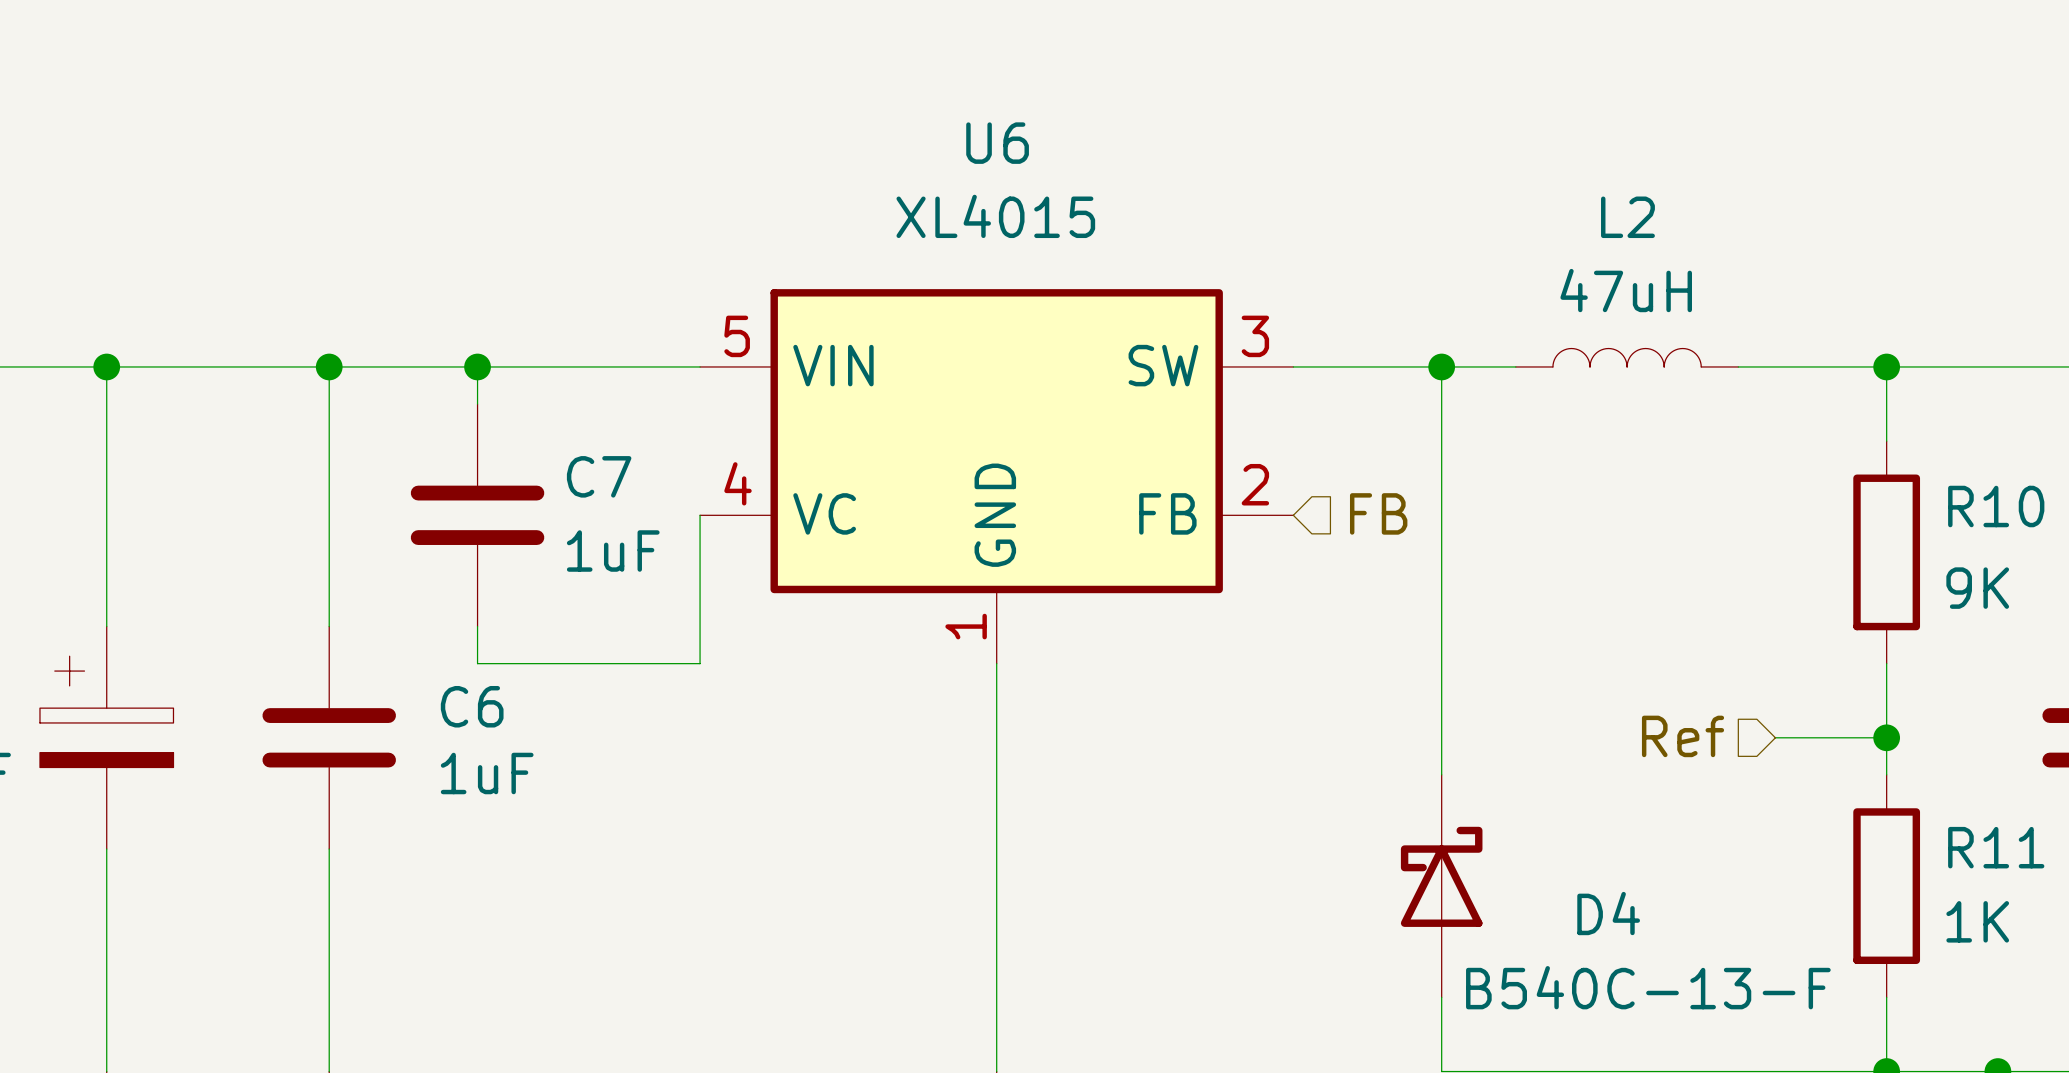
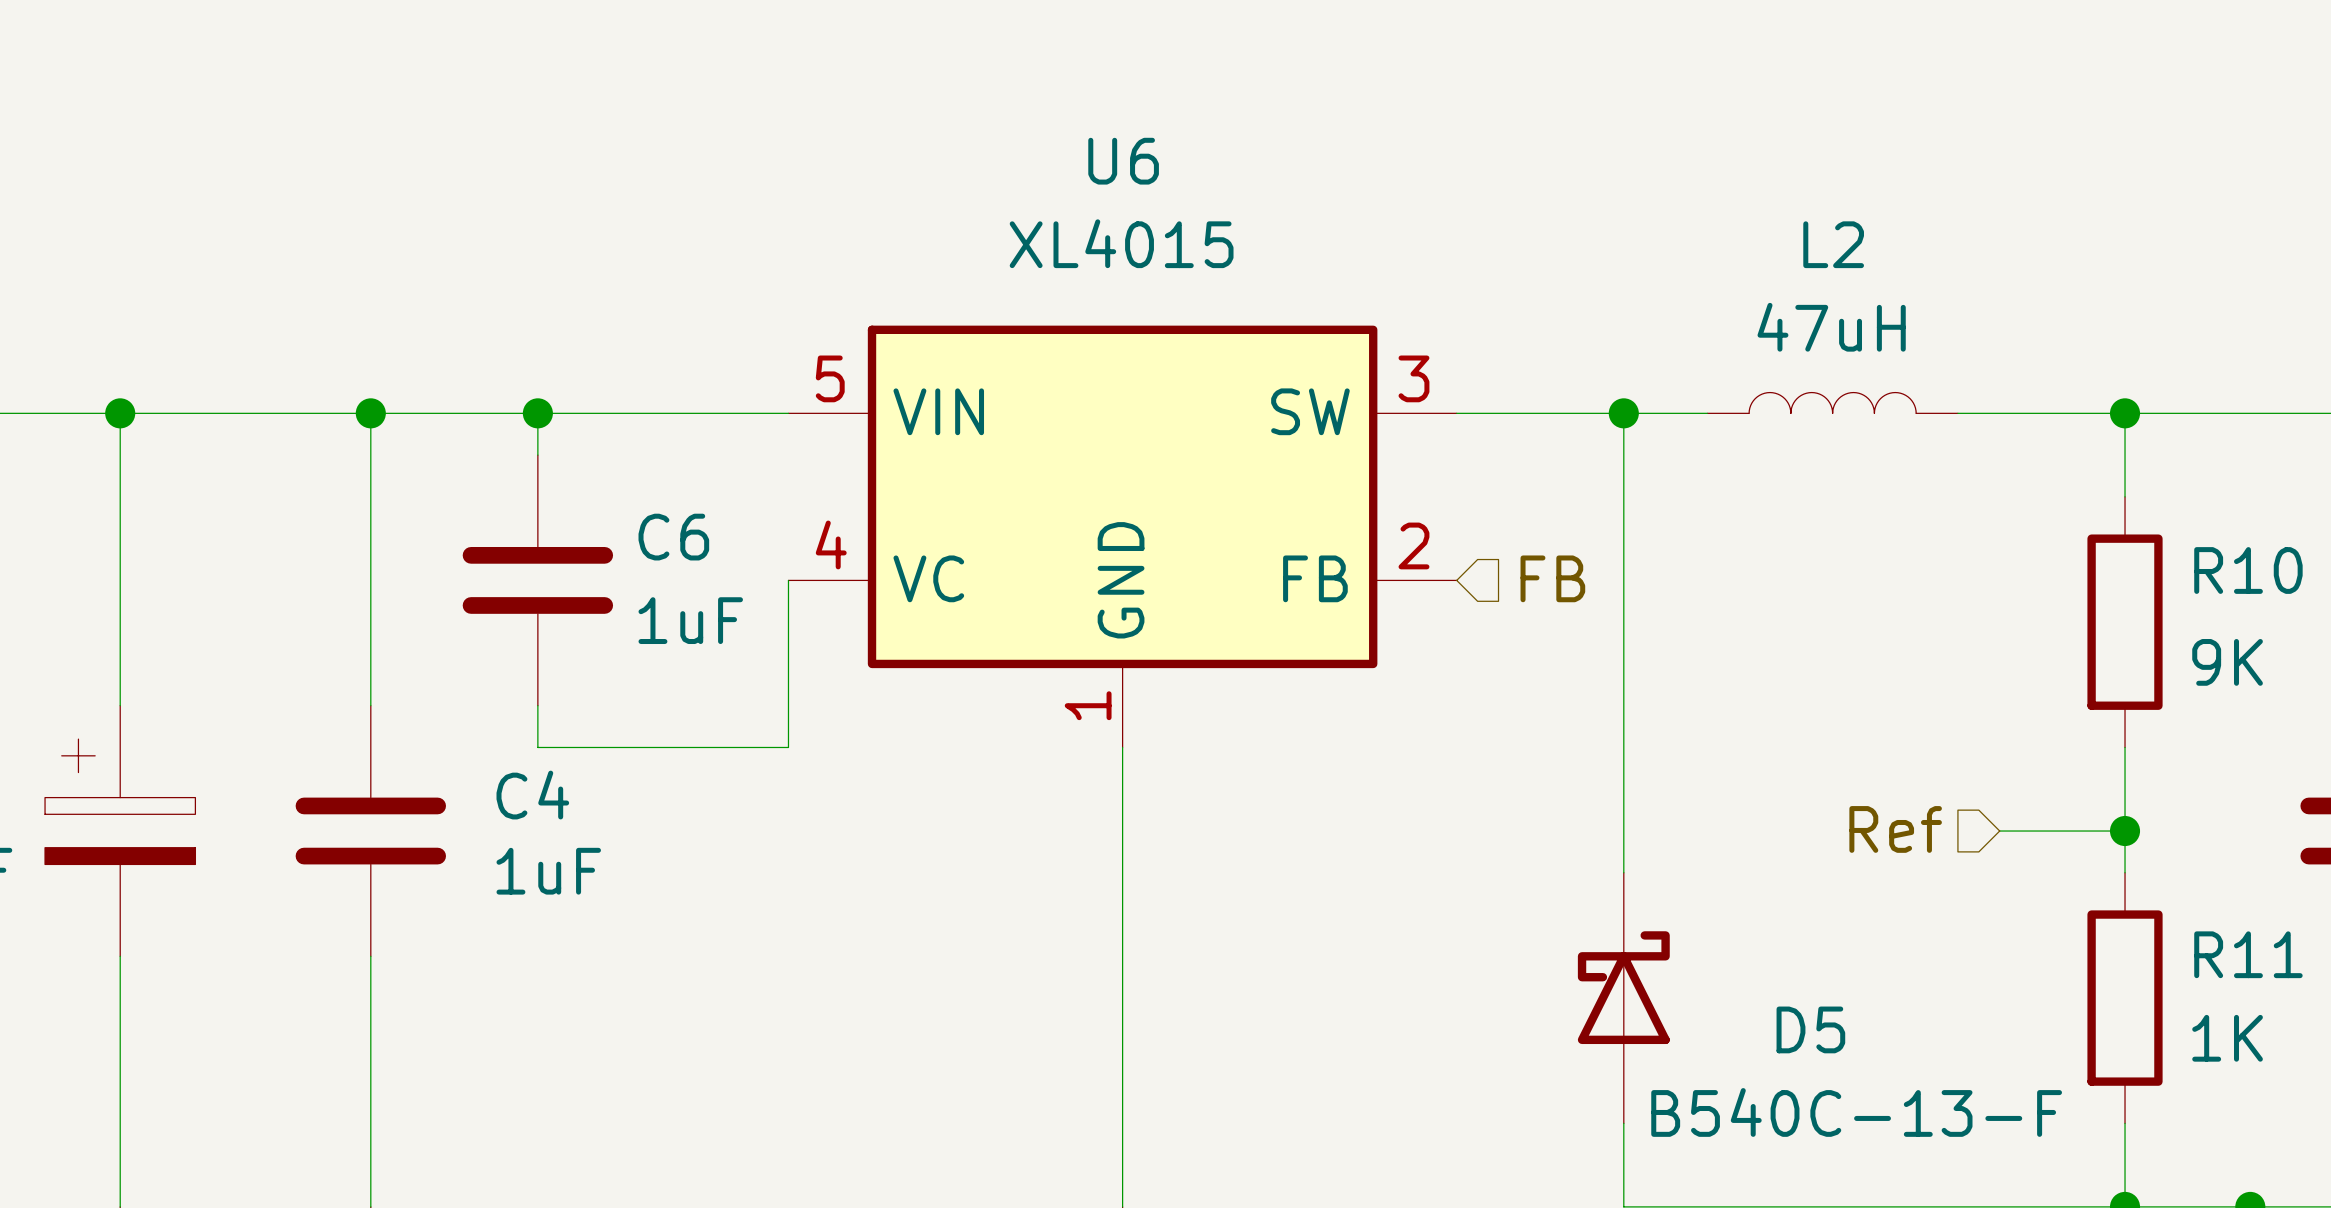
C7 name: C7 (599, 476) -> C6 (673, 537)
C6 name: C6 (472, 706) -> C4 (532, 795)
D4 name: D4 (1608, 913) -> D5 (1810, 1029)

